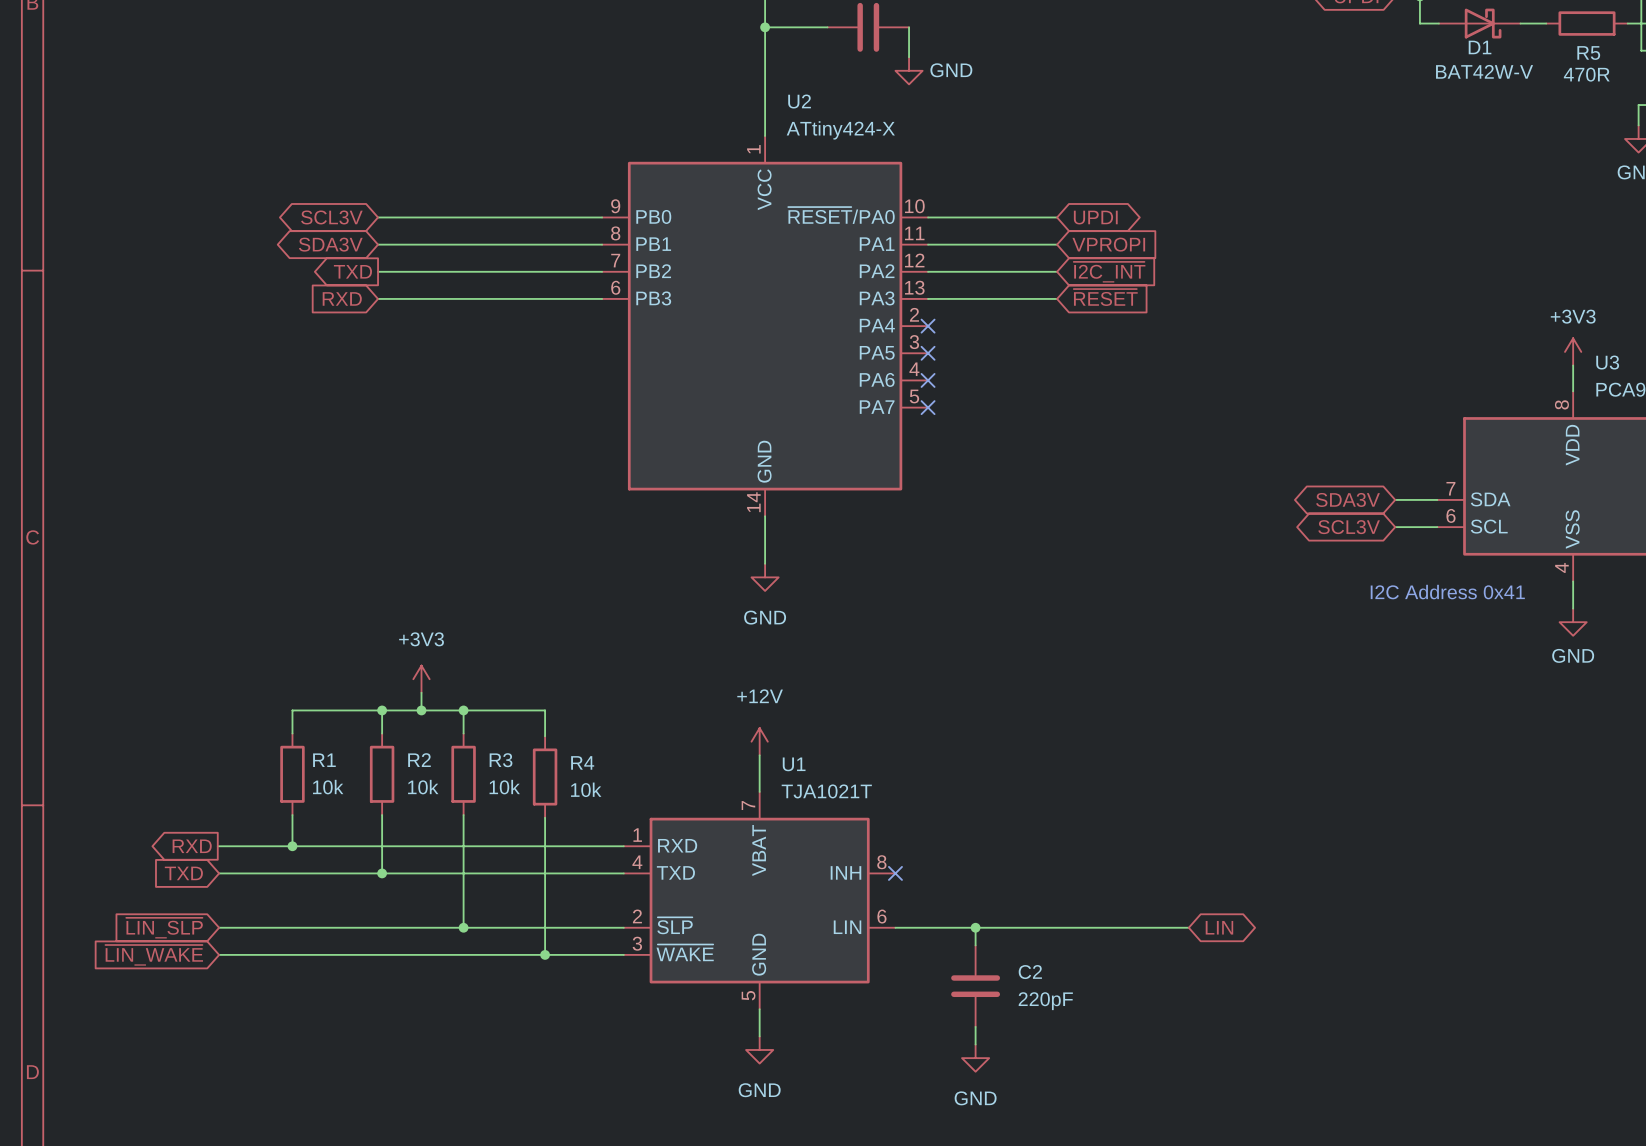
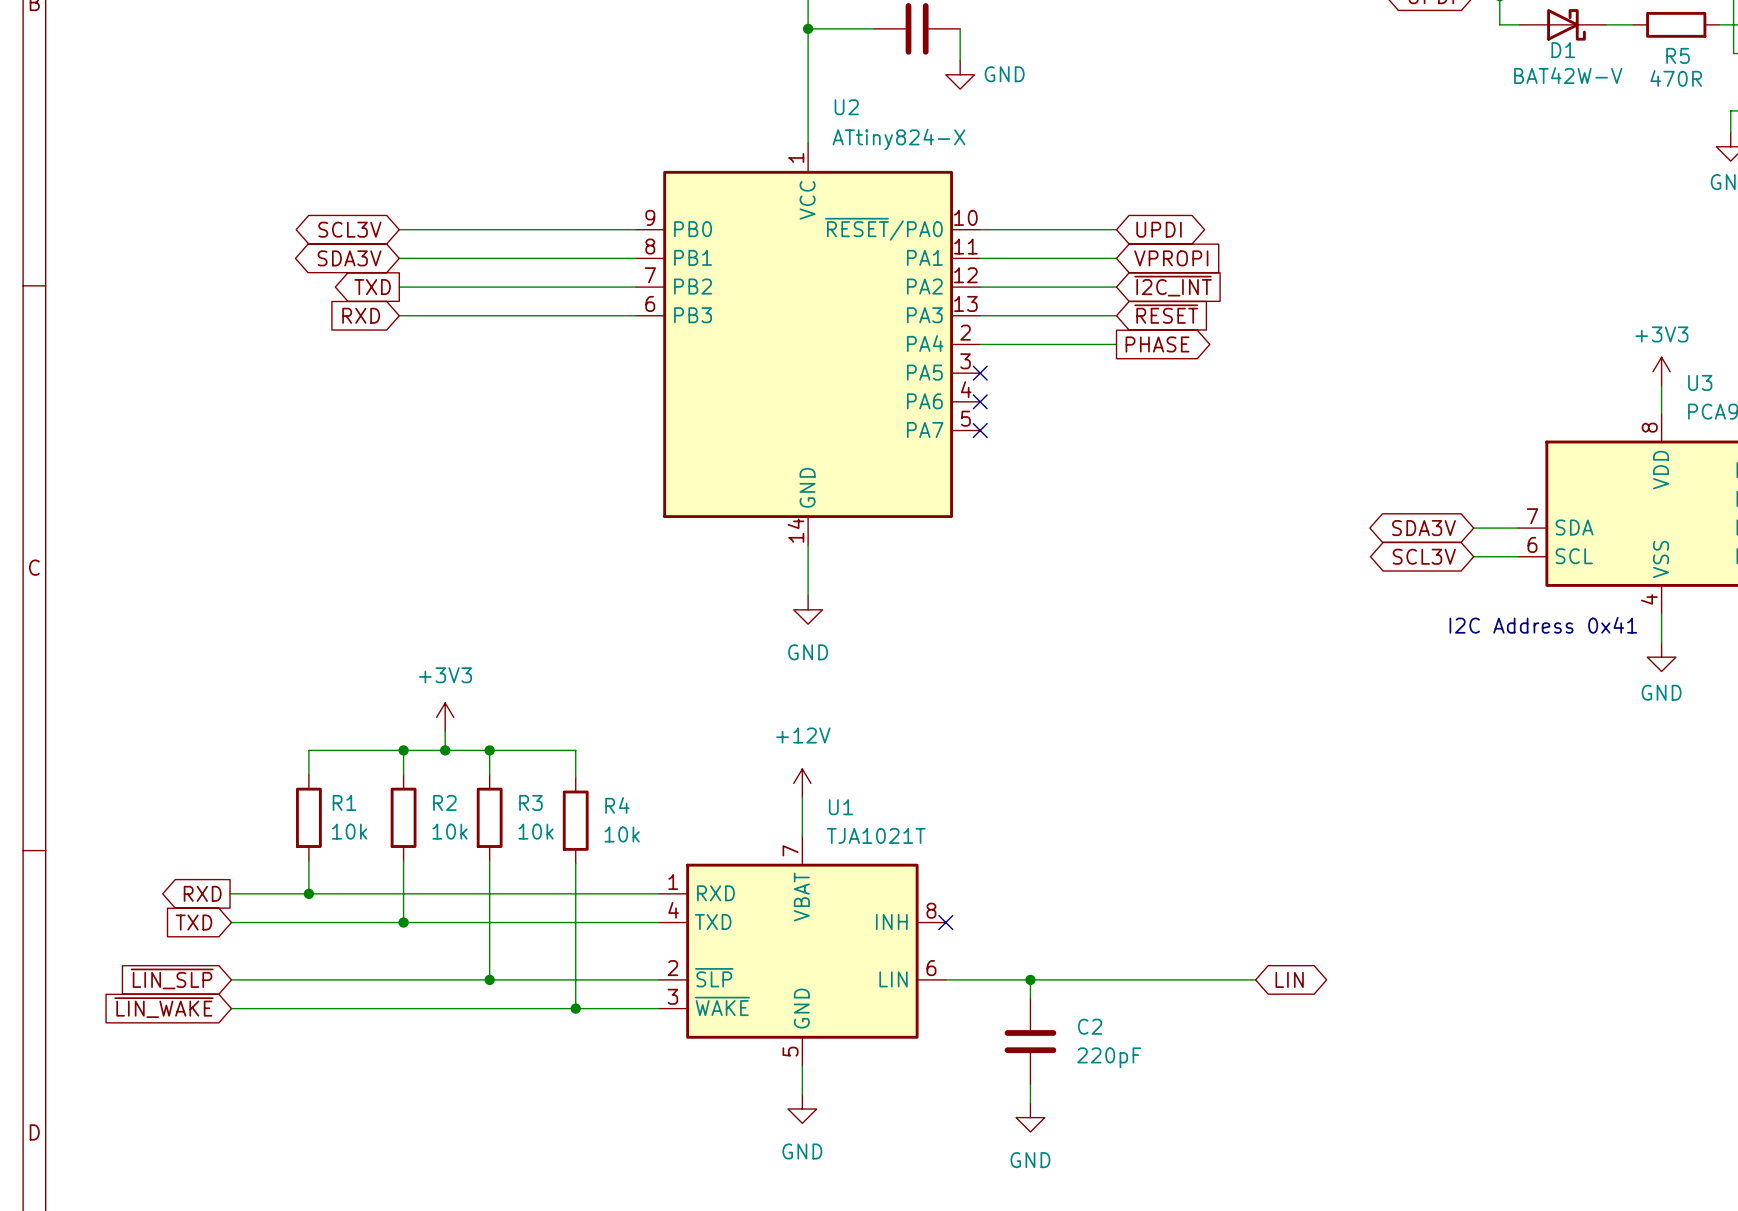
U2 value: ATtiny424-X (840, 130) -> ATtiny824-X (898, 139)
wire: none -> (980, 344) (1116, 344)
no-connect mark: (928, 326) -> none
global label: none -> PHASE (1157, 344)

